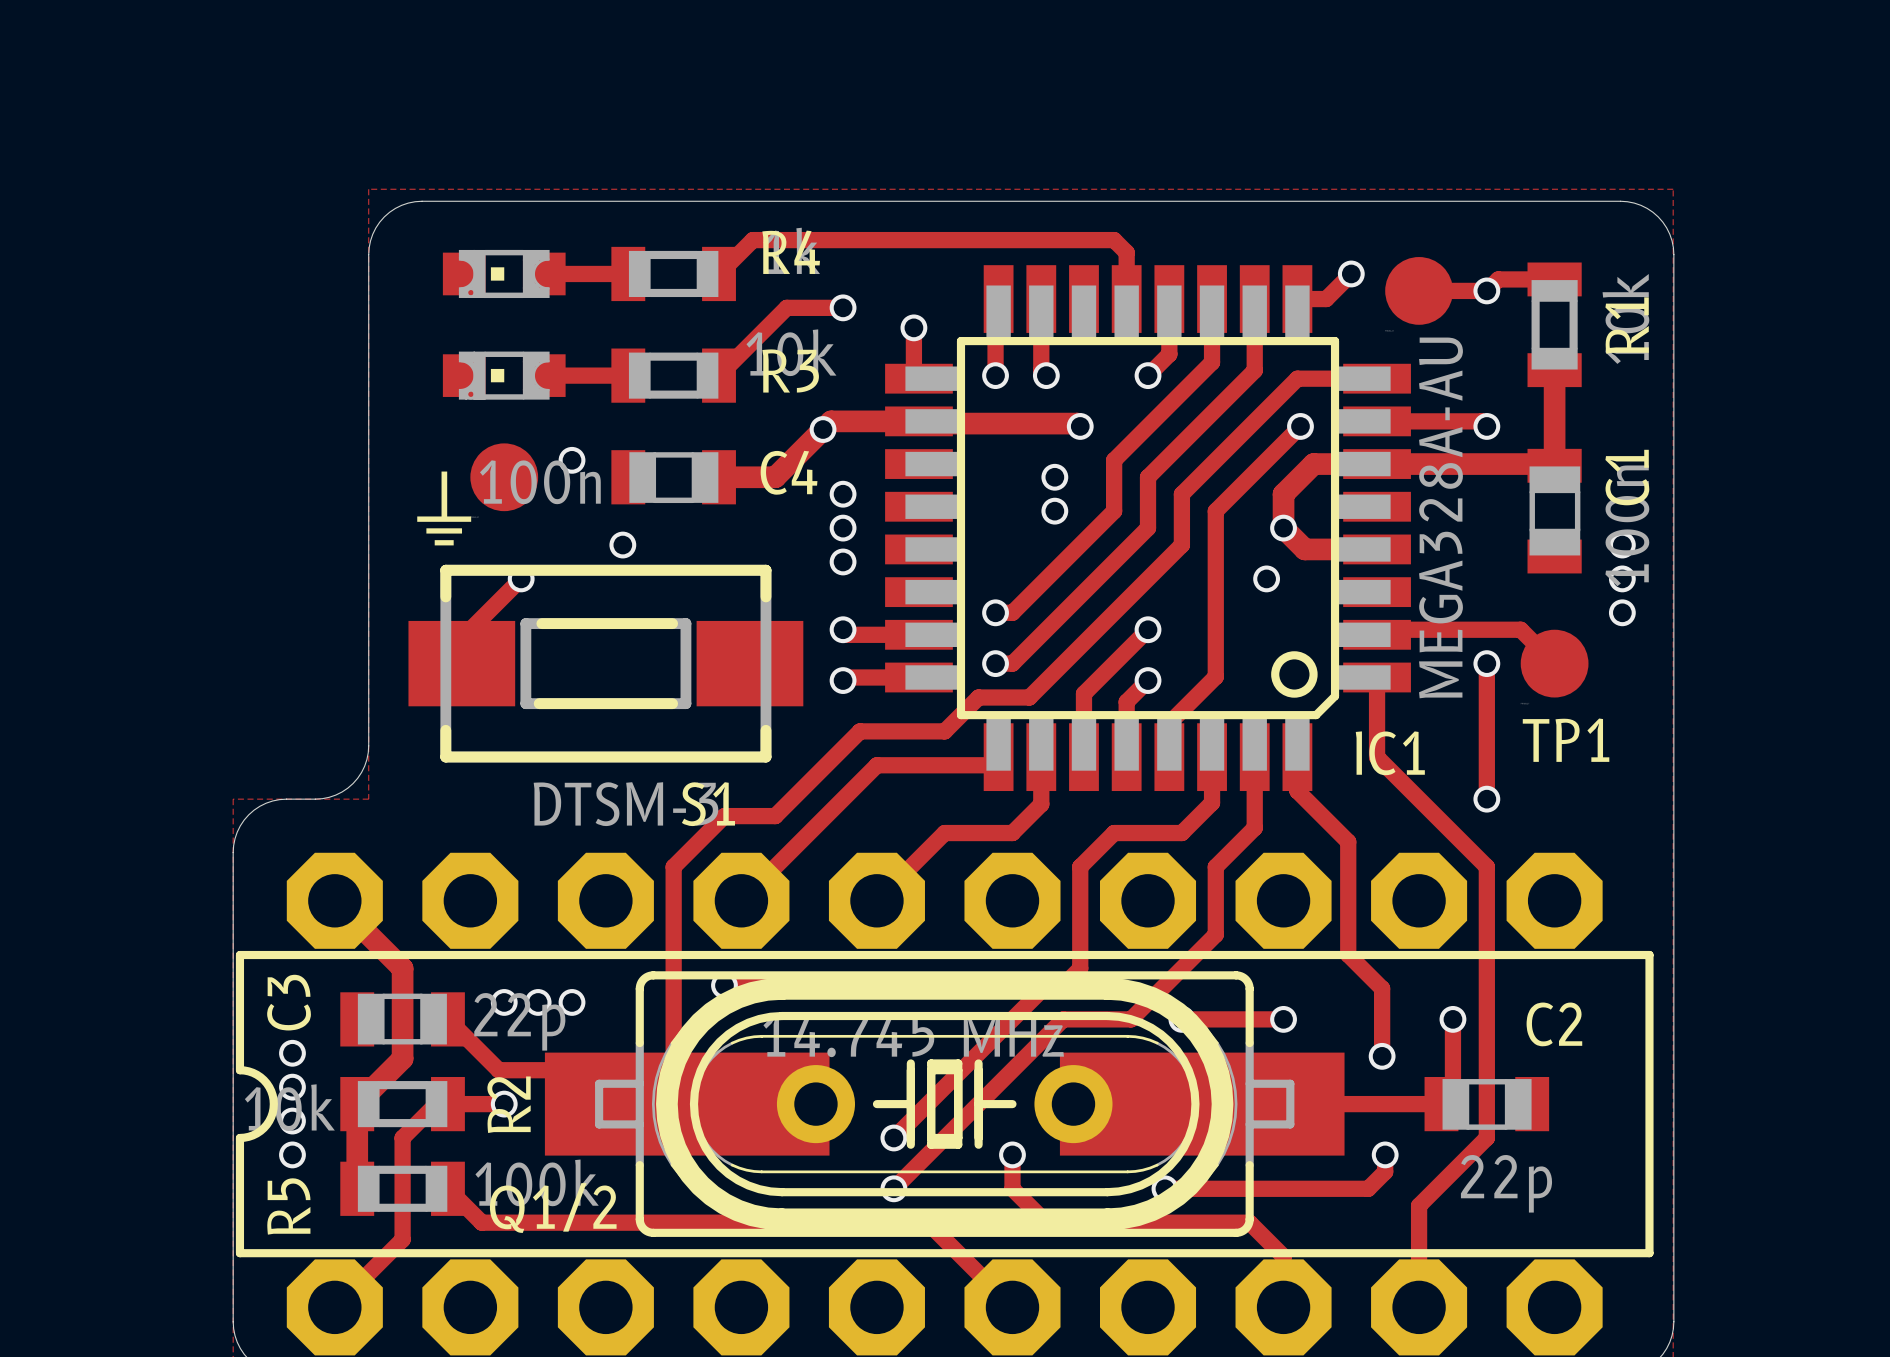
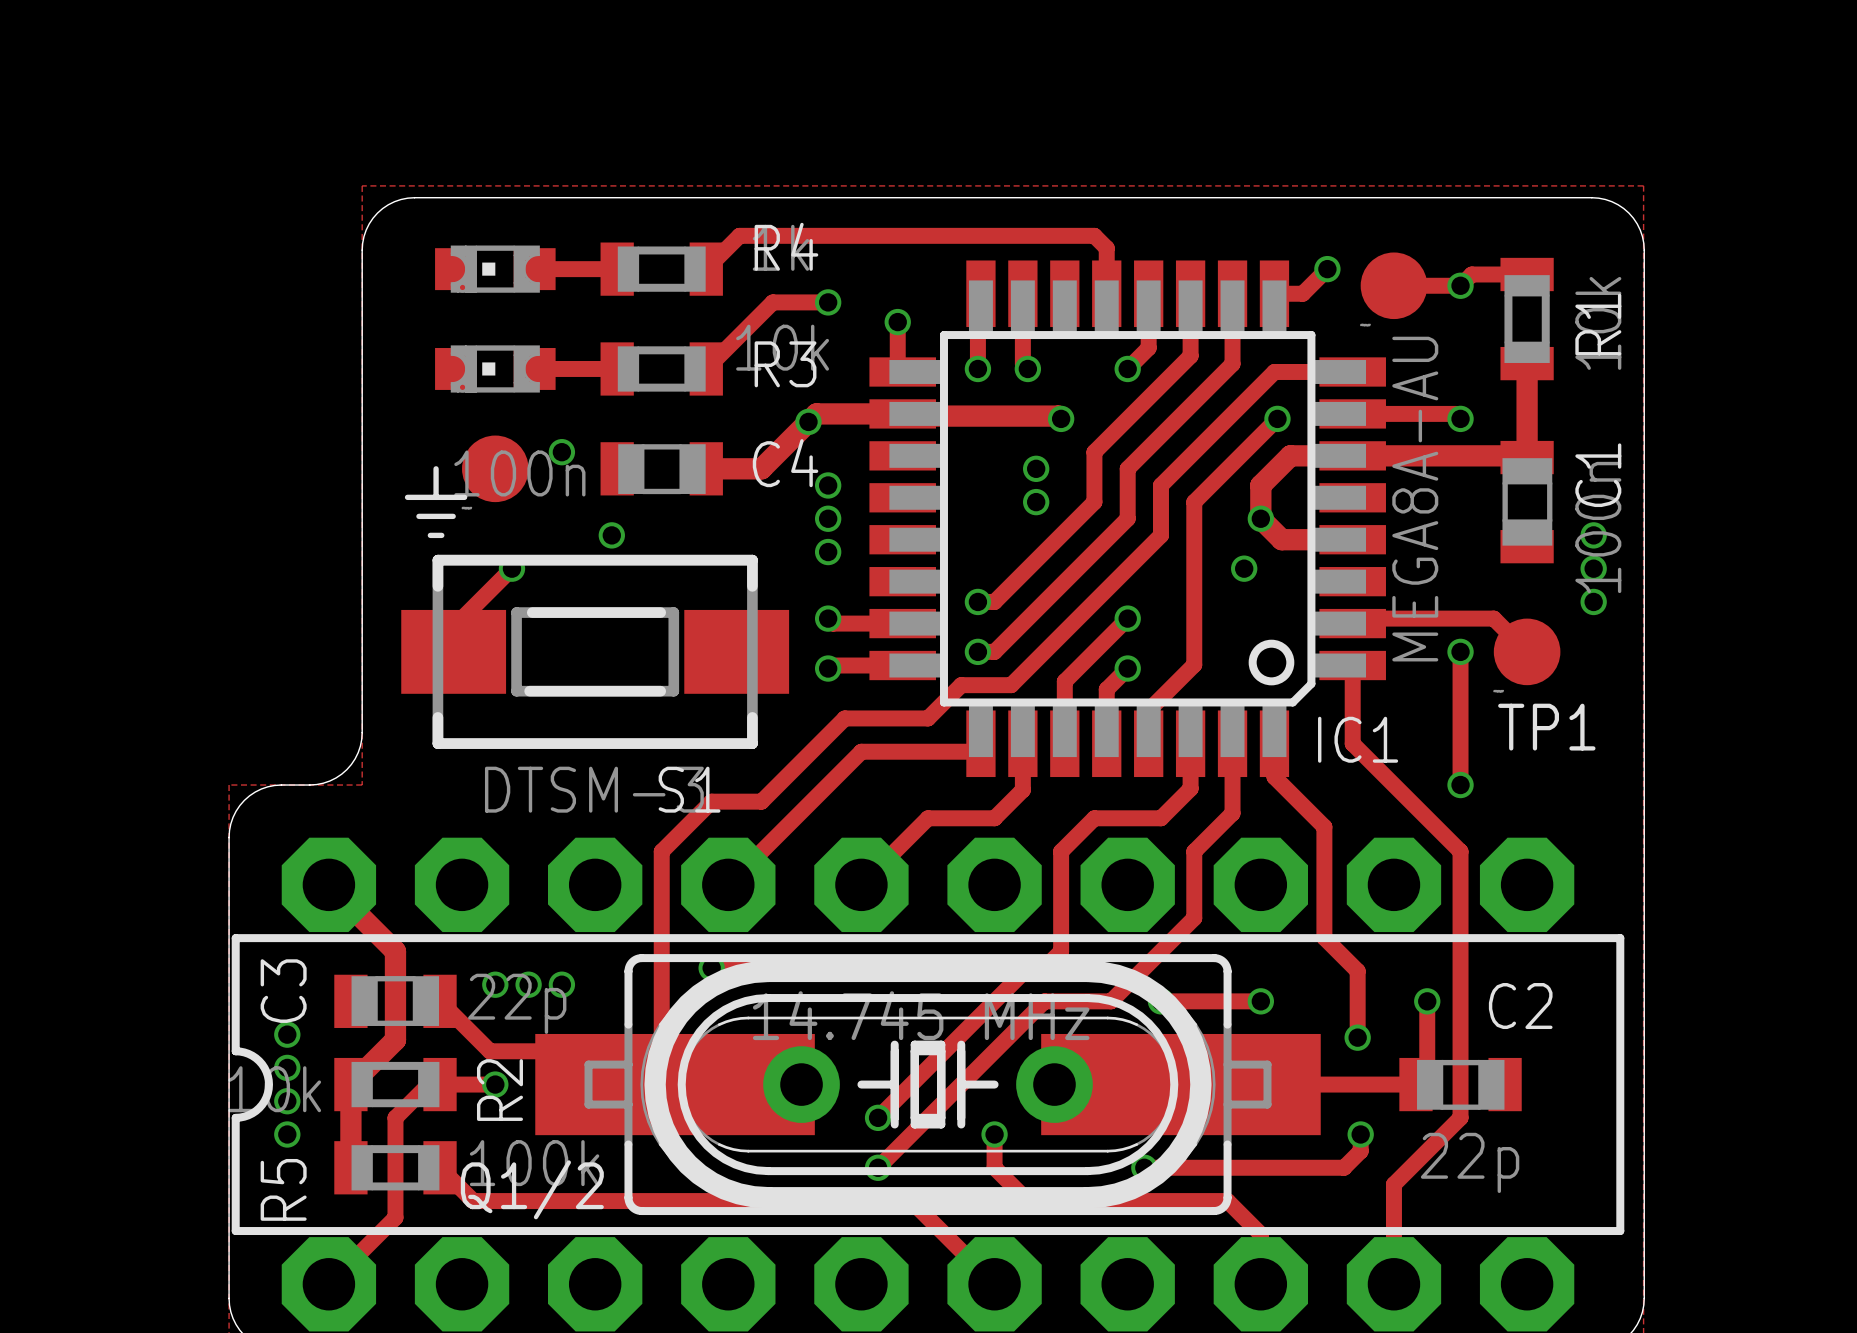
IC1 value: MEGA328A-AU (1441, 517) -> MEGA8A-AU (1415, 499)

